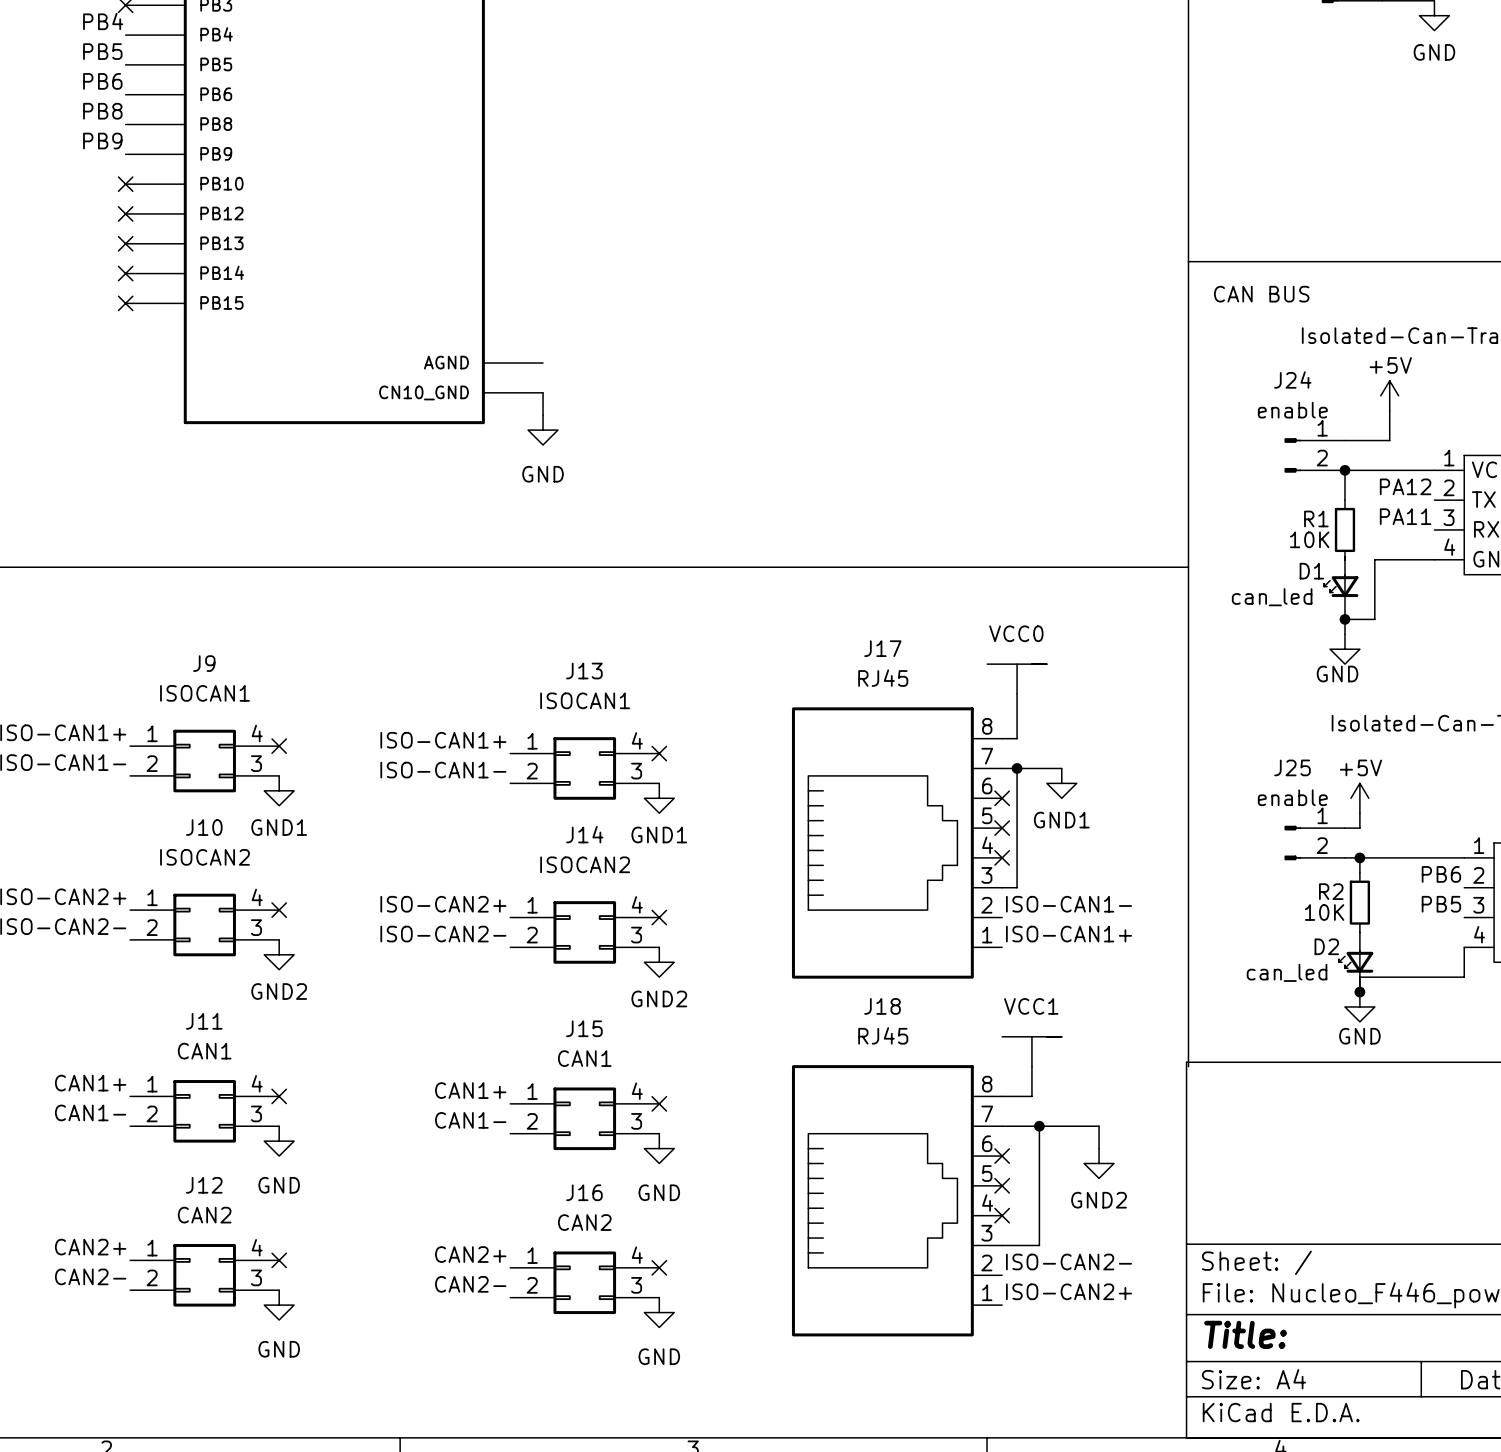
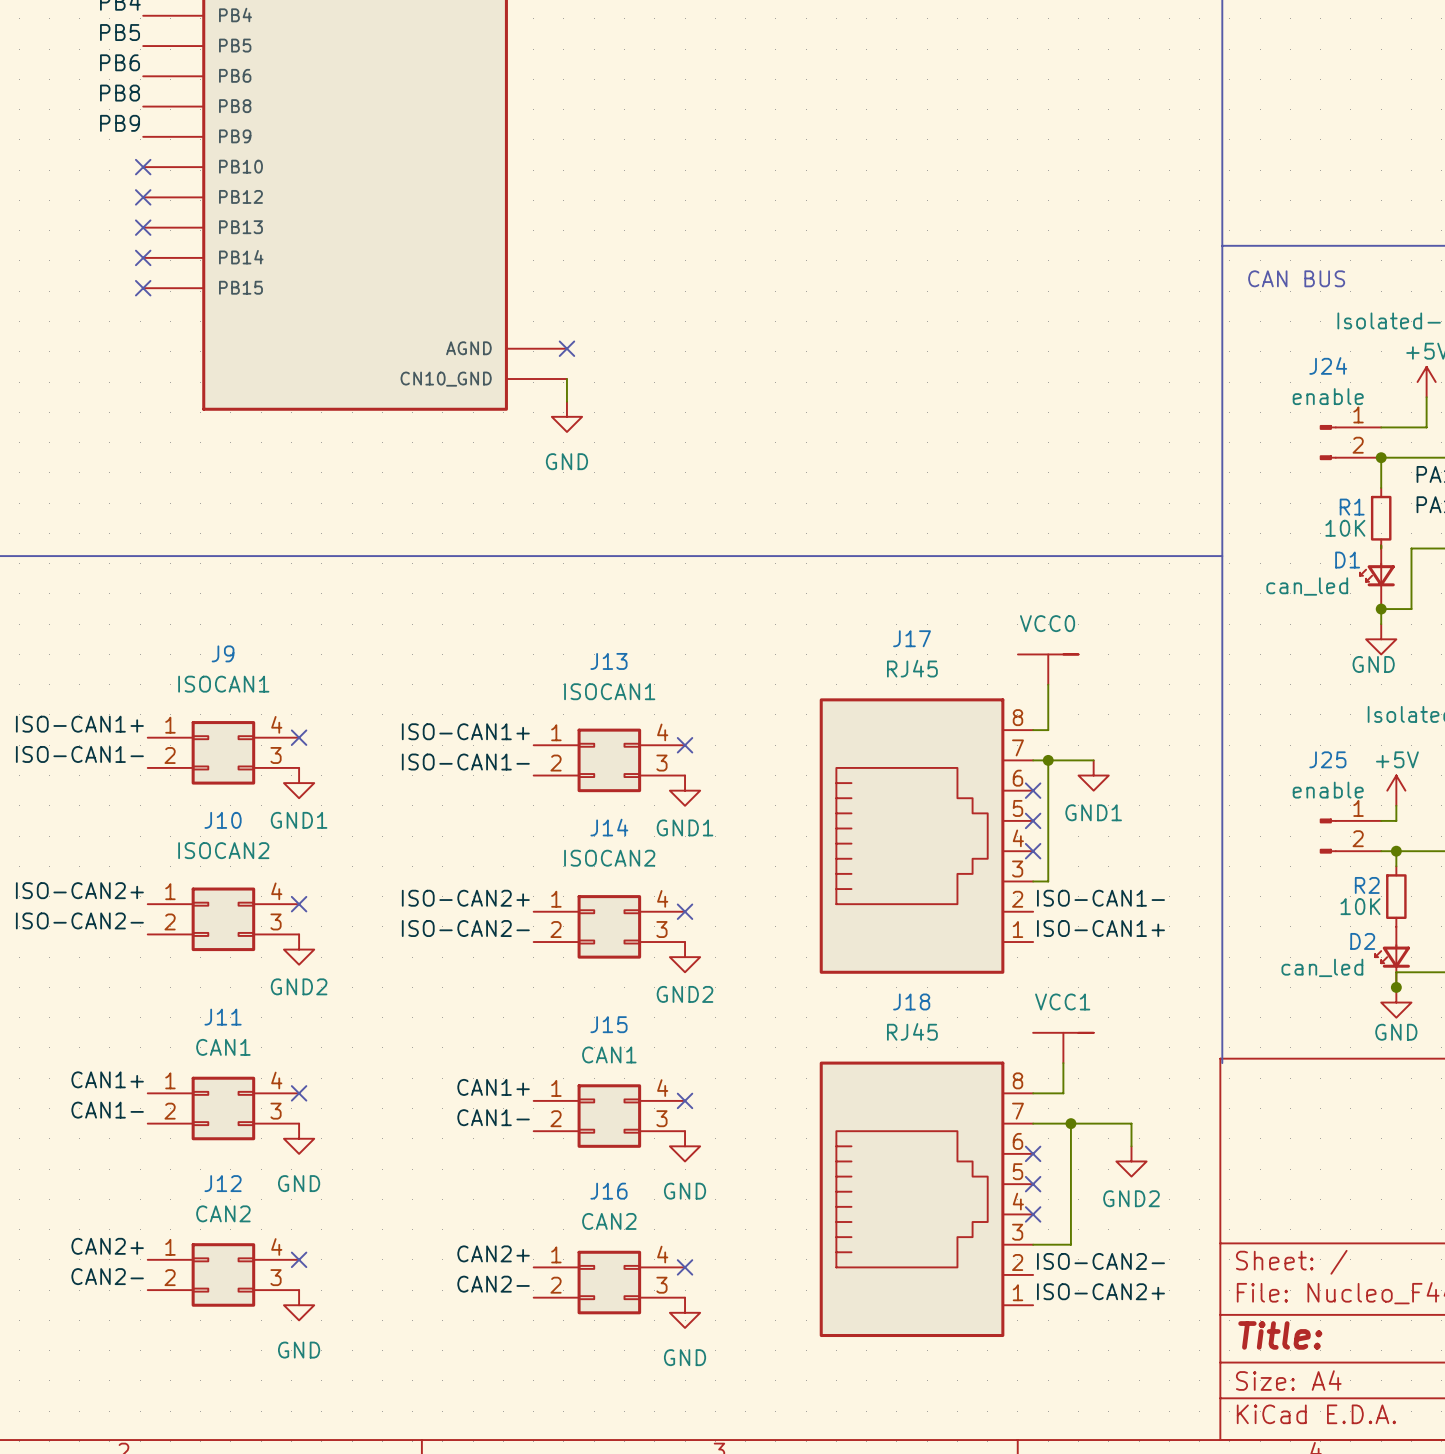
no-connect mark: none -> (566, 348)

